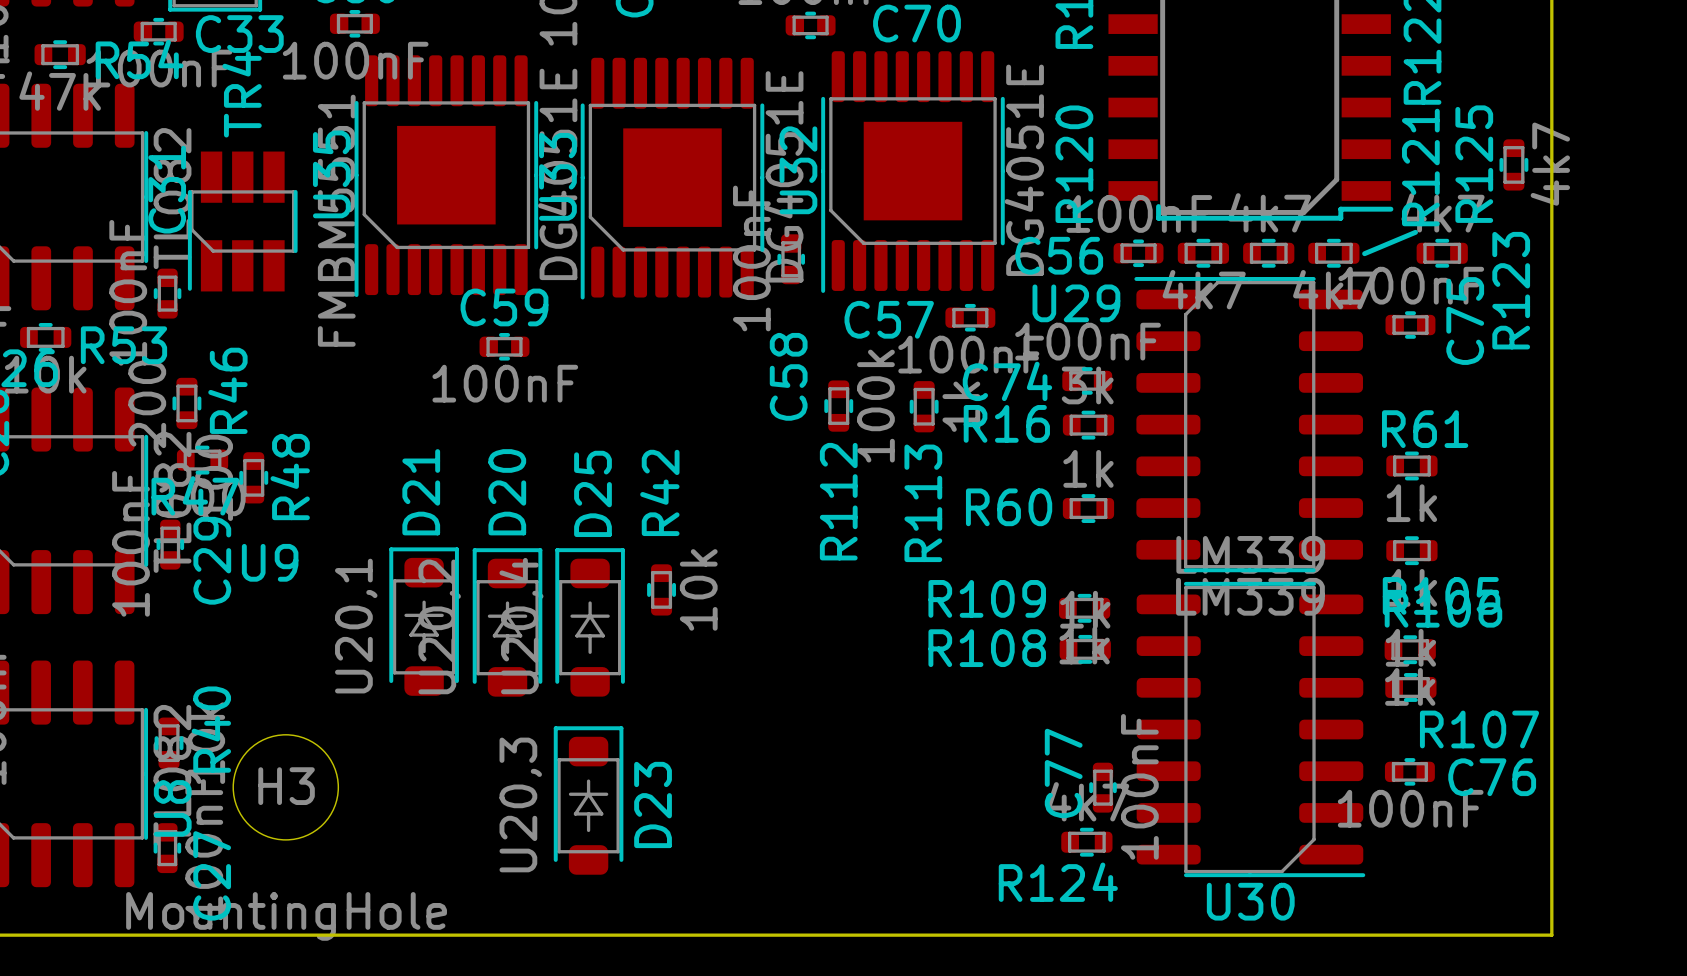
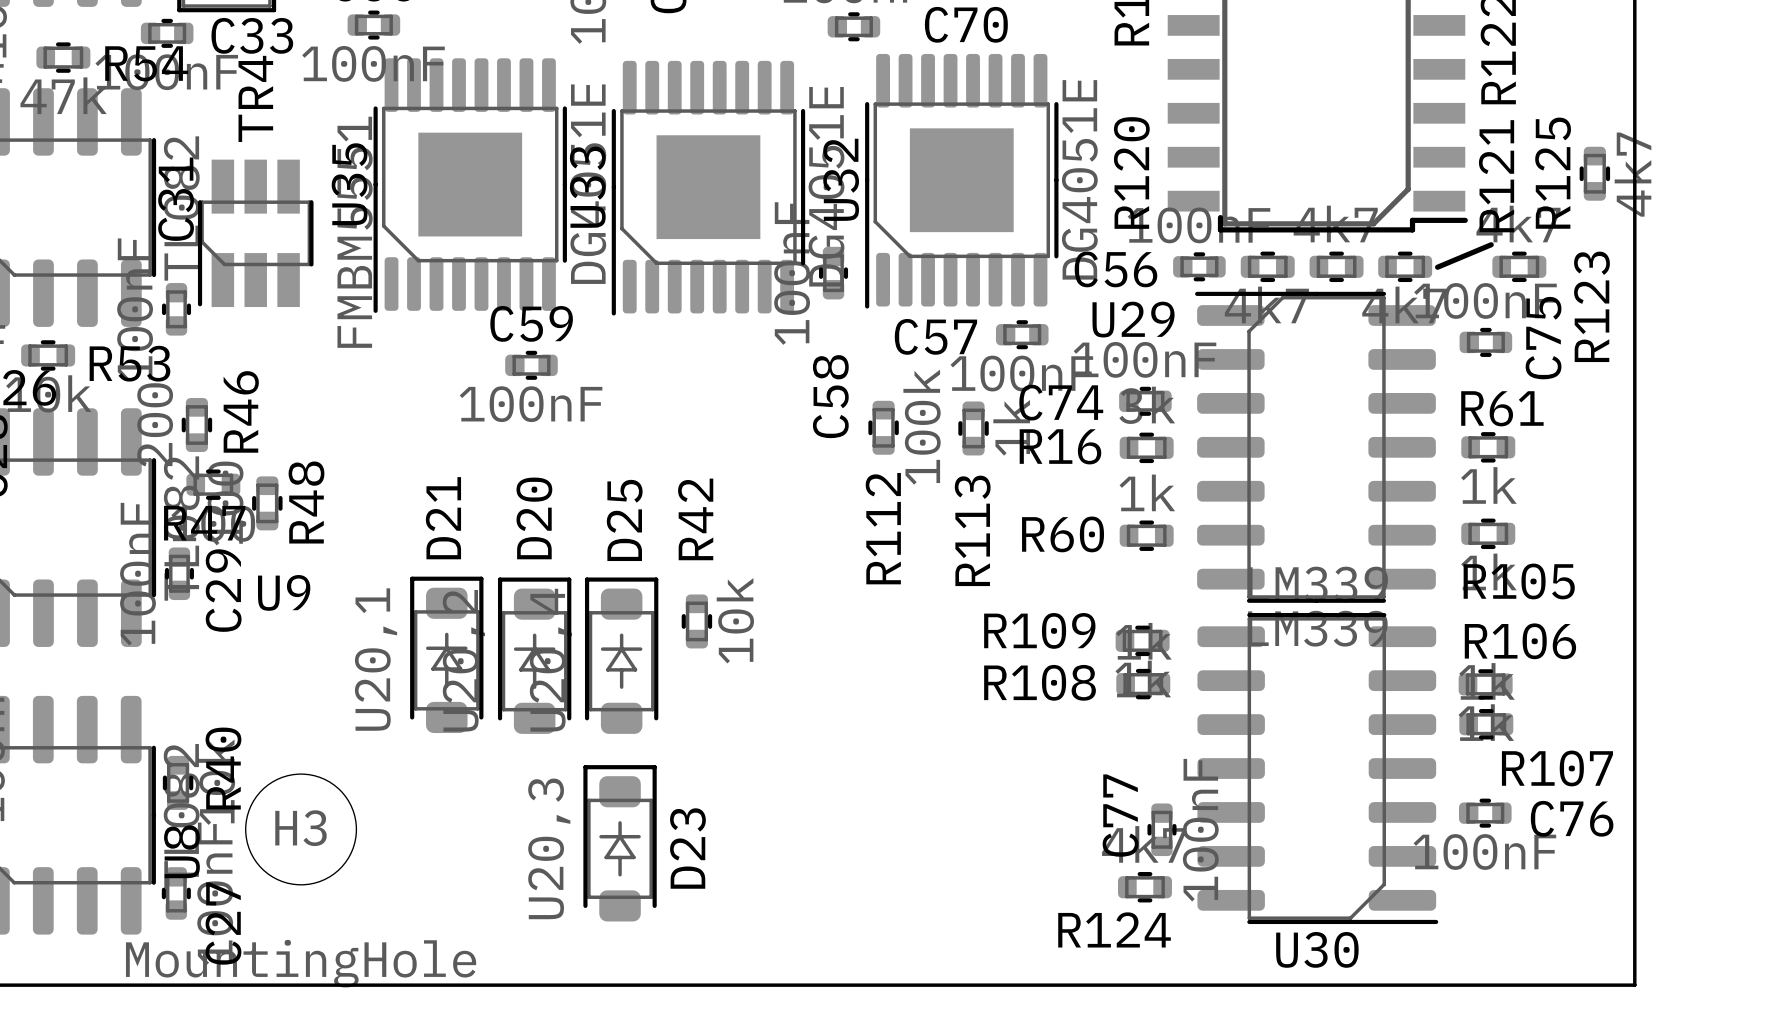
R61 position: (1411, 465) -> (1488, 447)
R105 position: (1411, 550) -> (1488, 533)

